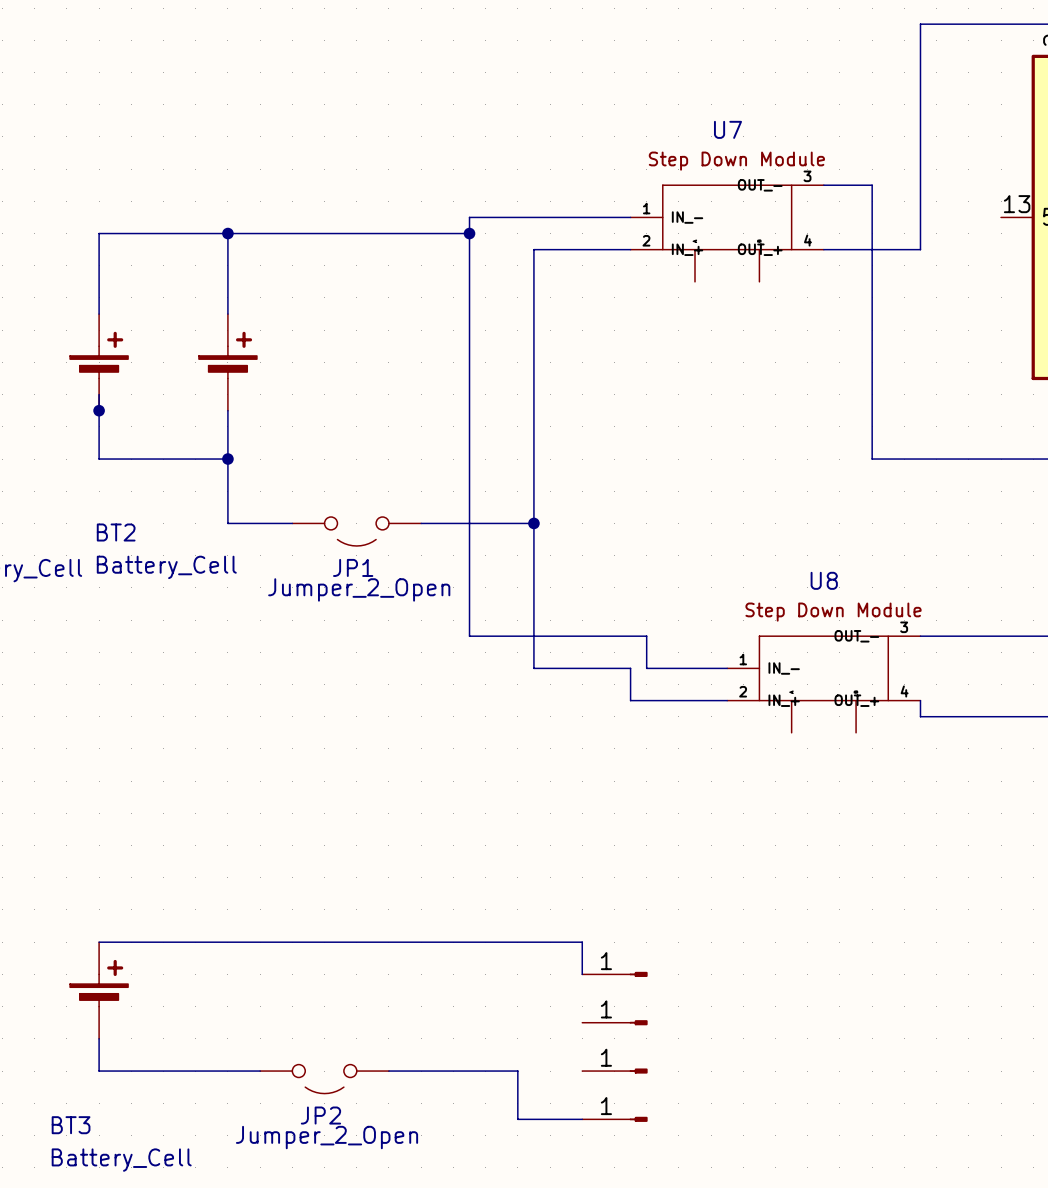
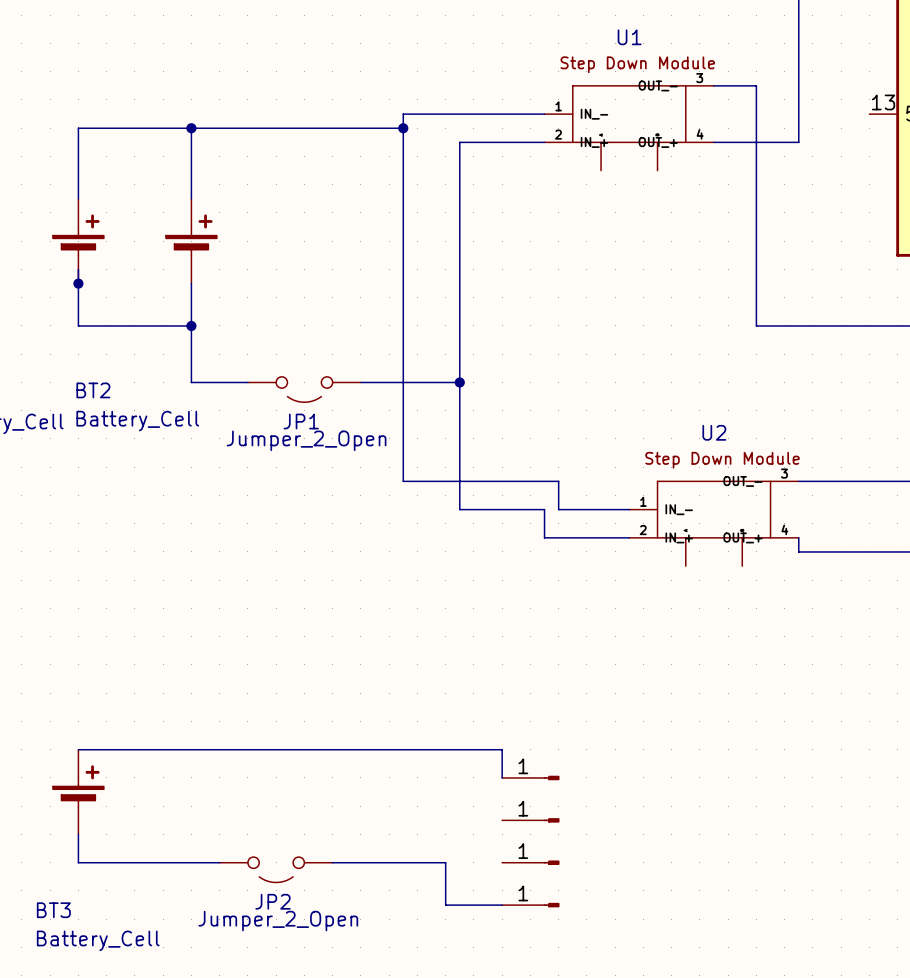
U7 name: U7 (727, 129) -> U1 (629, 37)
U8 name: U8 (824, 580) -> U2 (714, 432)

